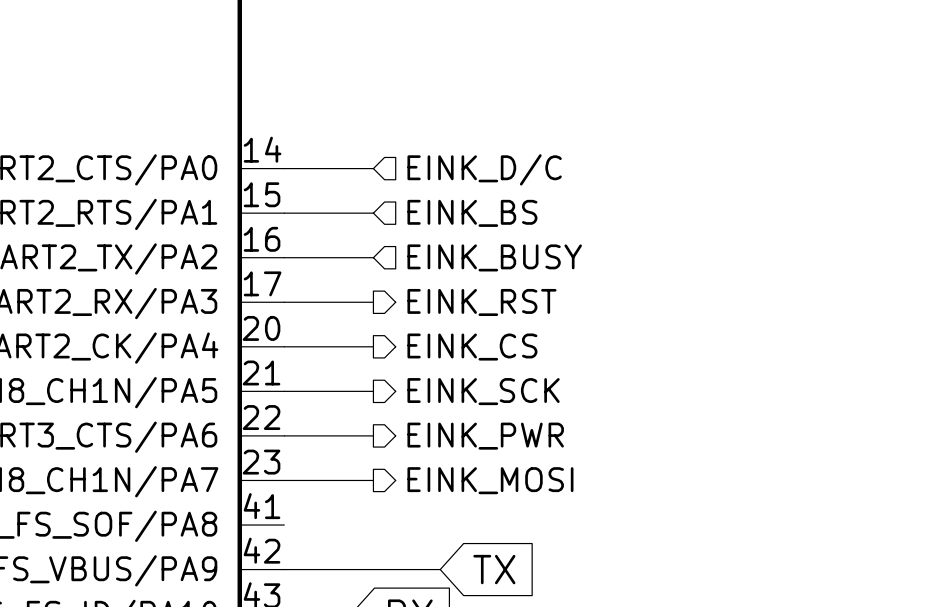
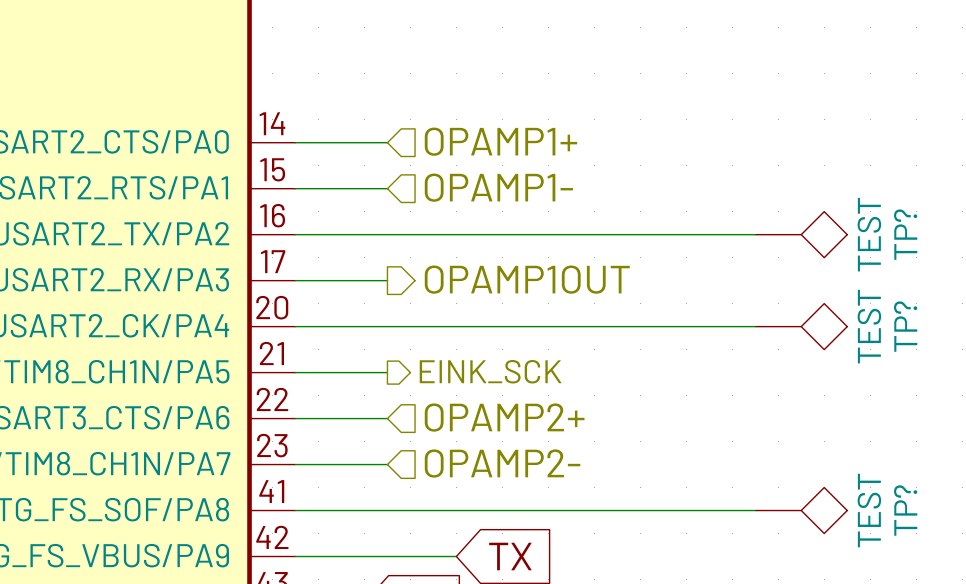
hierarchical label: EINK_D/C (484, 169) -> OPAMP1+ (500, 141)
hierarchical label: EINK_BS (472, 213) -> OPAMP1- (498, 187)
wire: none -> (387, 234) (755, 234)
hierarchical label: EINK_BUSY (494, 257) -> none
TP?: none -> TEST (801, 234)
hierarchical label: EINK_RST (481, 302) -> OPAMP1OUT (527, 279)
wire: none -> (387, 326) (755, 326)
TP?: none -> TEST (801, 326)
hierarchical label: EINK_CS (472, 347) -> none
hierarchical label shape: output (485, 436) -> input (504, 417)
hierarchical label: EINK_PWR (485, 436) -> OPAMP2+ (504, 417)
hierarchical label shape: output (490, 480) -> input (502, 463)
hierarchical label: EINK_MOSI (490, 480) -> OPAMP2- (502, 463)
wire: none -> (295, 510) (755, 510)
TP?: none -> TEST (801, 510)

